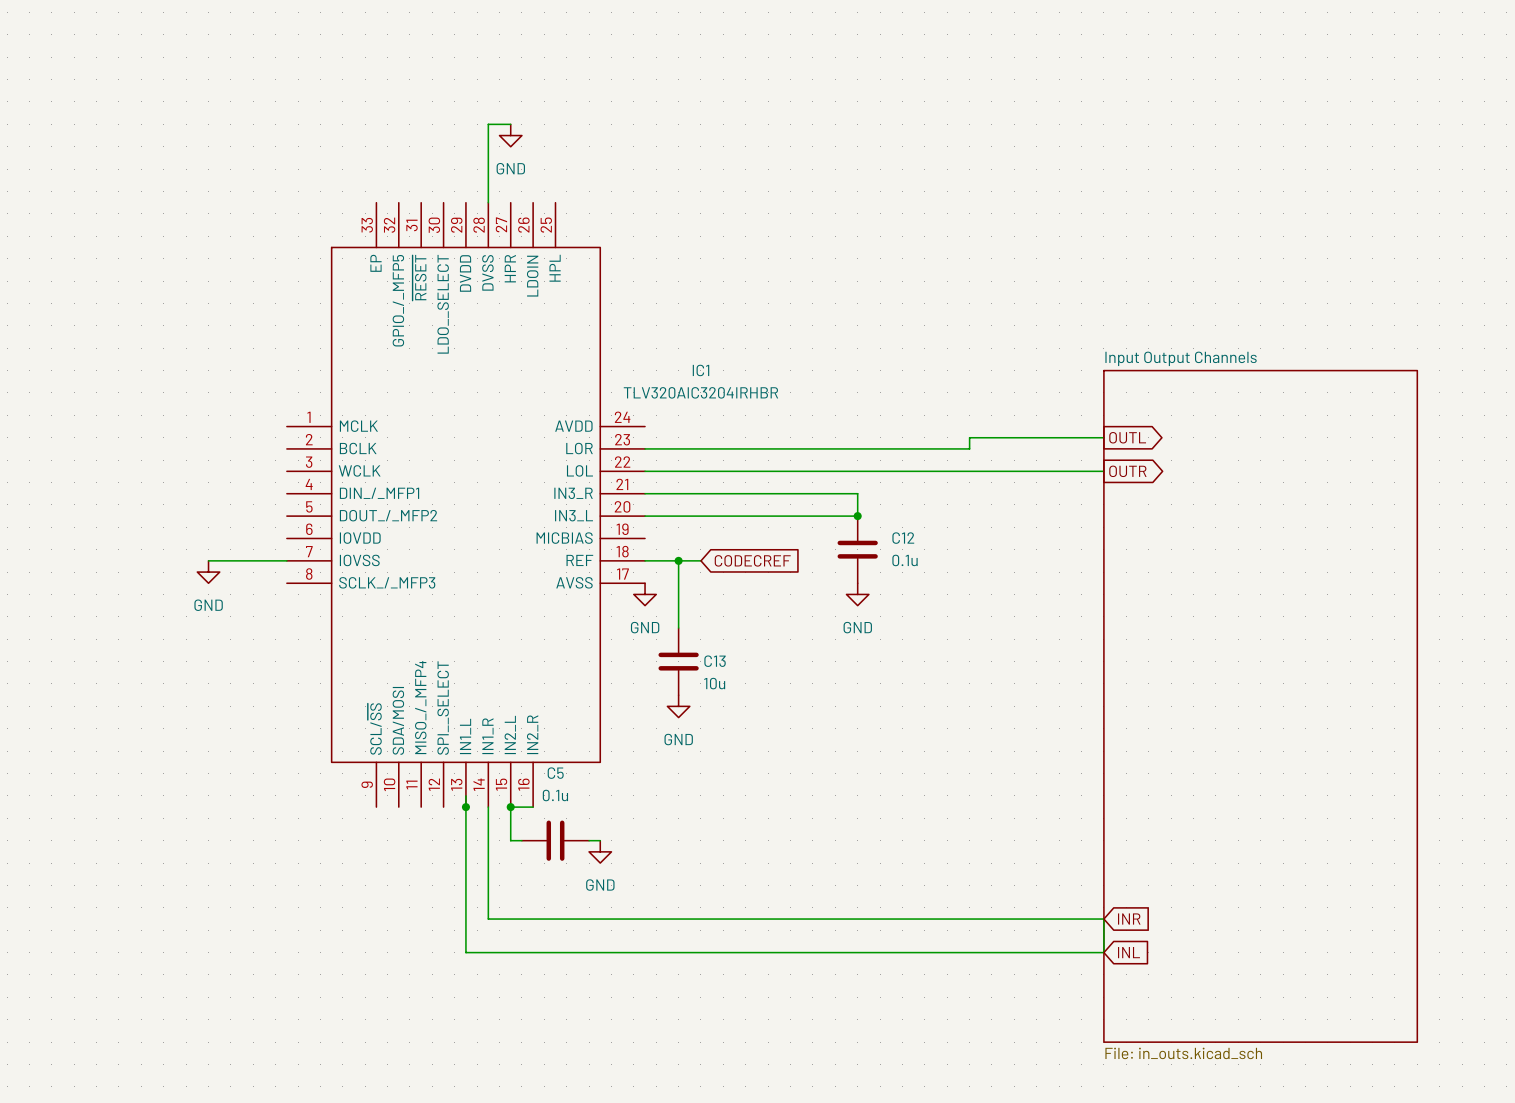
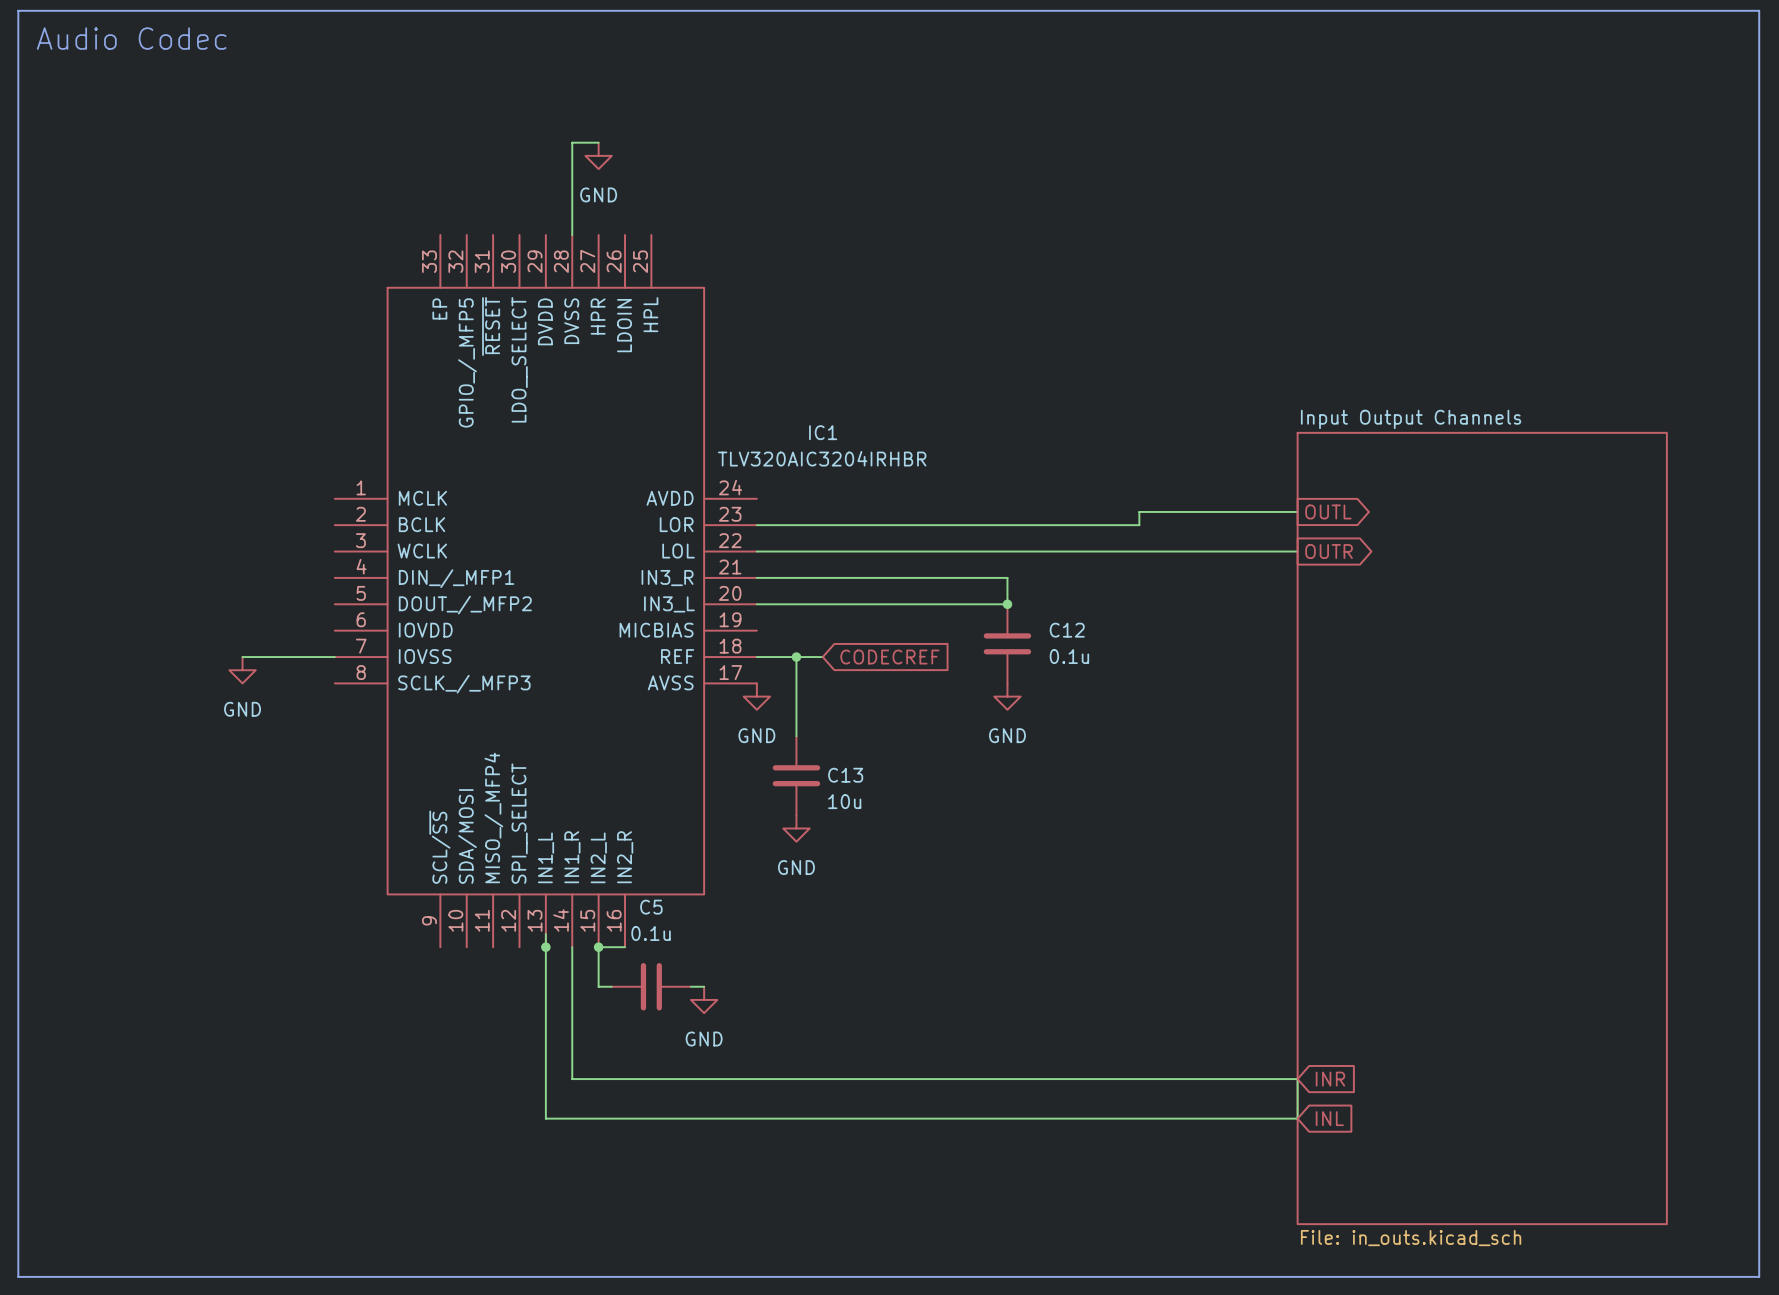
line: none -> (18, 10) (1759, 10) (1759, 1276) (18, 1276) (18, 10)
text: none -> Audio Codec (131, 38)

